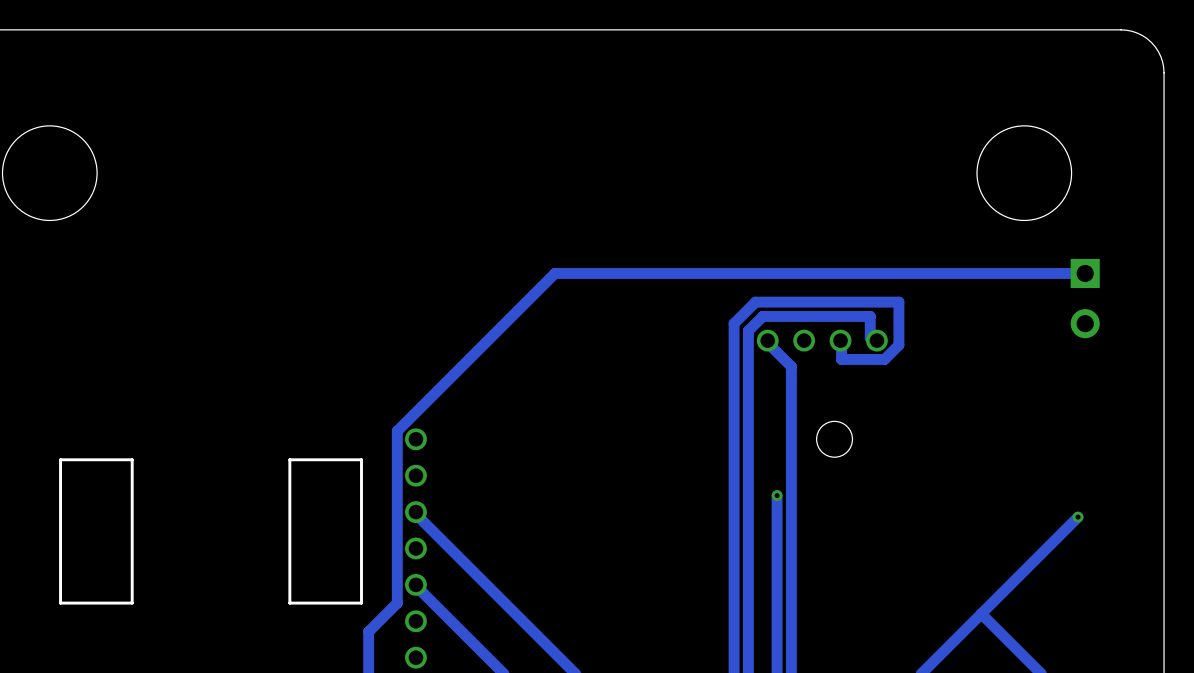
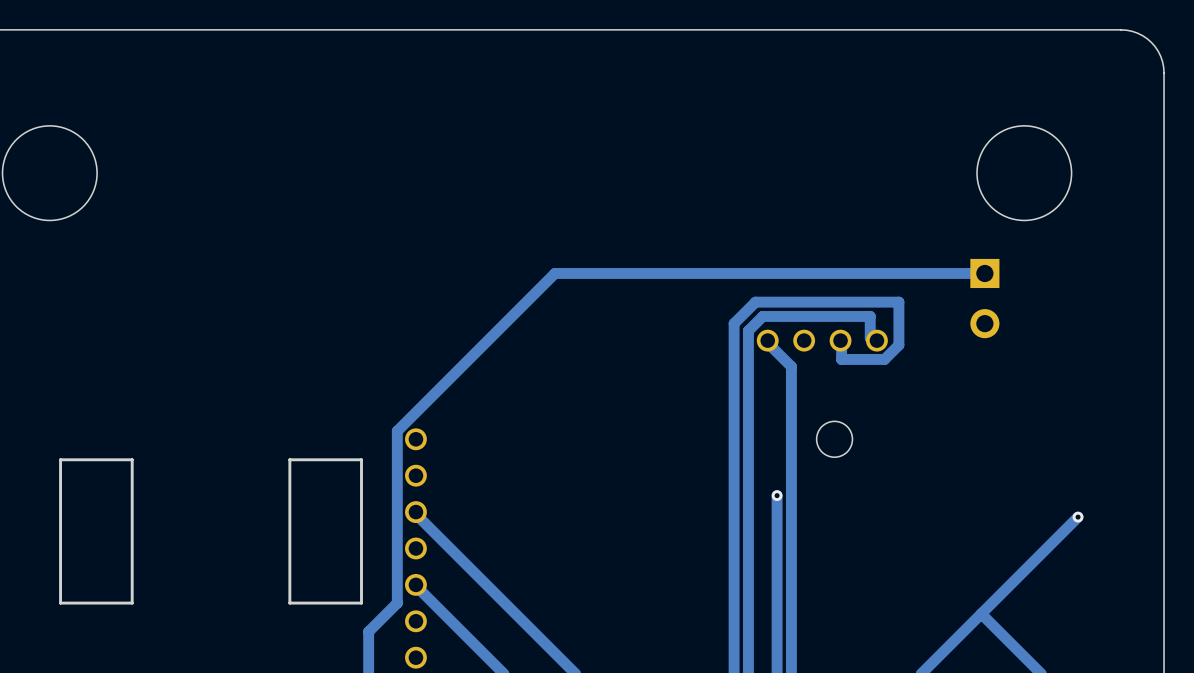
track: (1085, 273) (984, 273) -> none
part position: (1085, 298) -> (984, 298)

